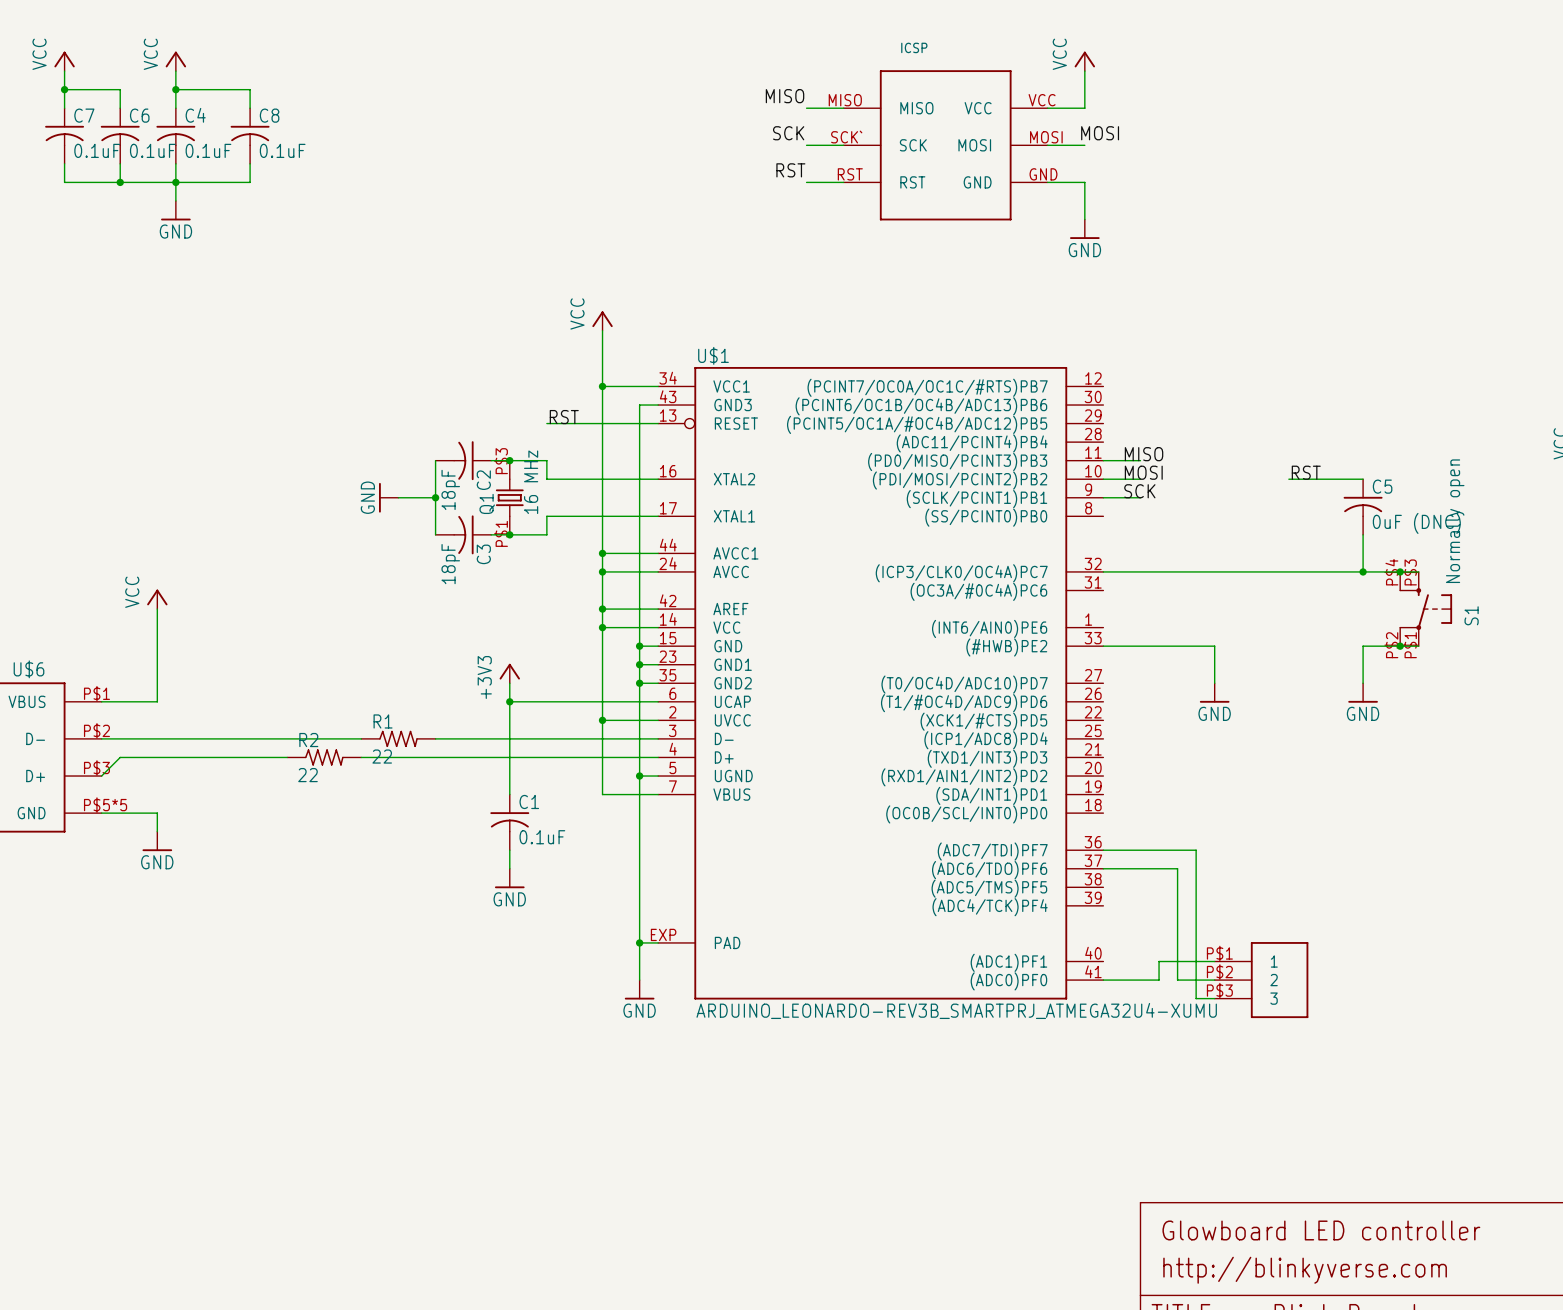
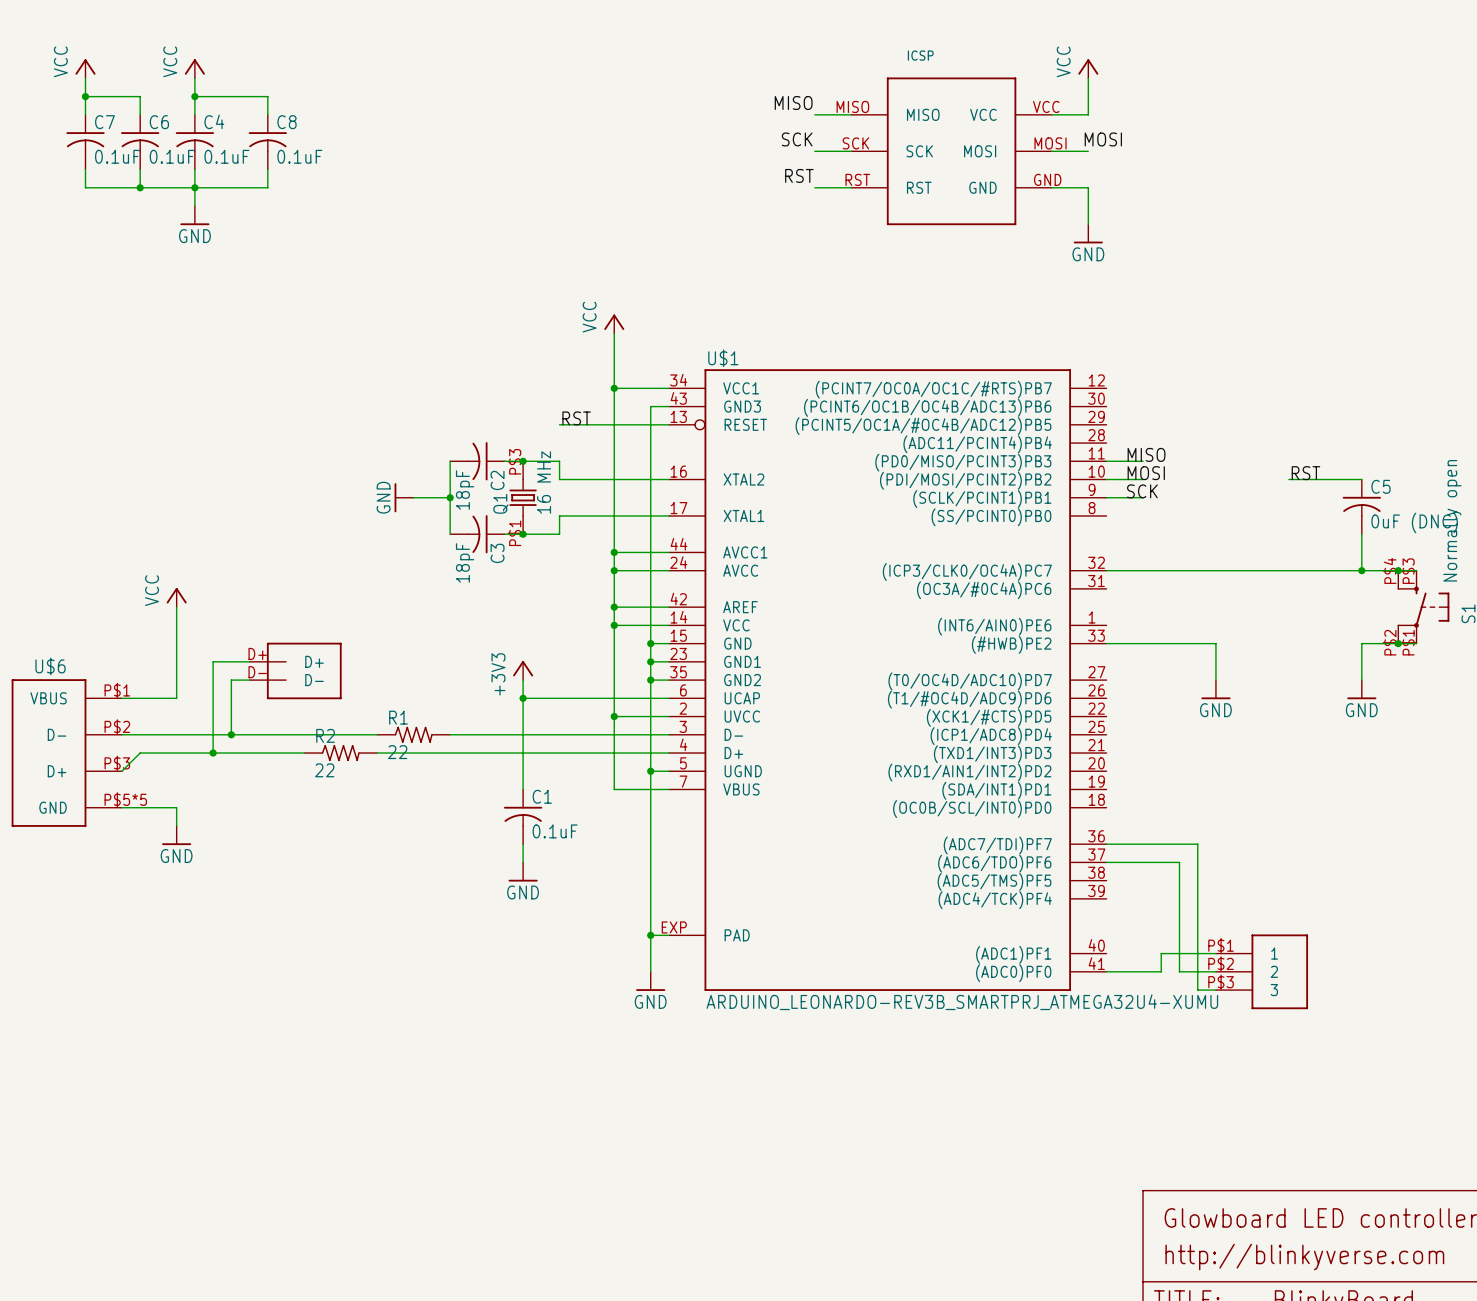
part pin number: SCK` (846, 137) -> SCK (855, 143)
wire: none -> (249, 661) (213, 661) (213, 753)
part: none -> (295, 670)
wire: none -> (249, 680) (231, 680) (231, 734)
junction: none -> (231, 734)
junction: none -> (213, 753)

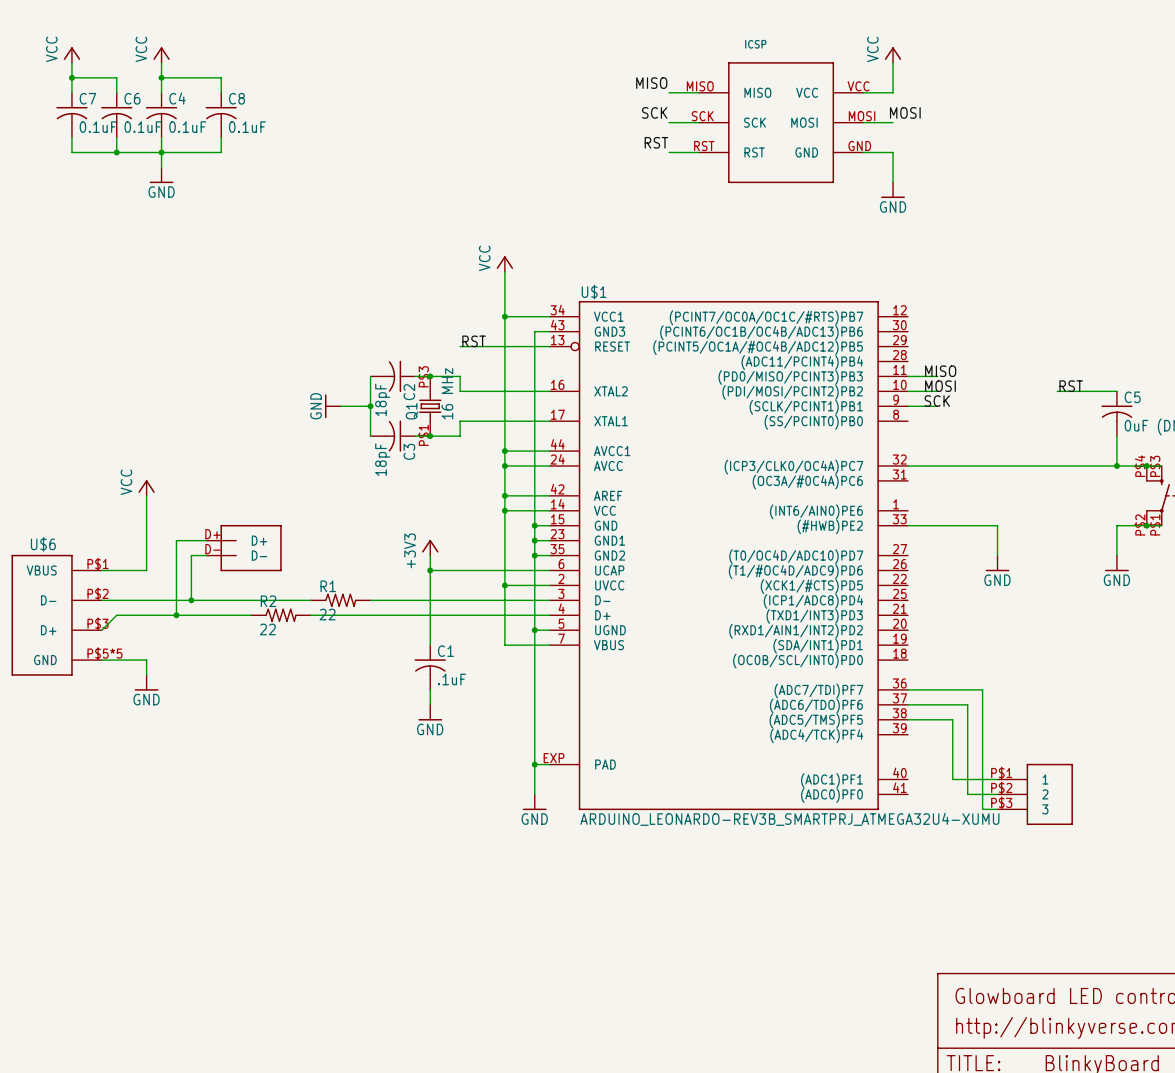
C1 value: 0.1uF (555, 831) -> .1uF (452, 679)
wire: (1161, 953) (1161, 971) (1106, 971) -> (952, 779) (952, 719) (907, 719)

